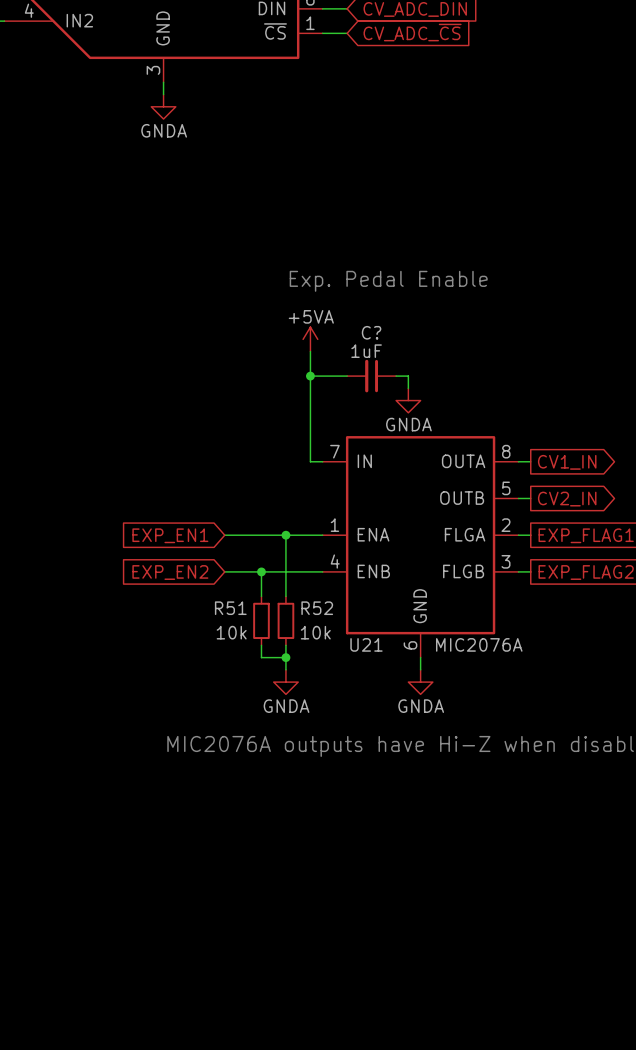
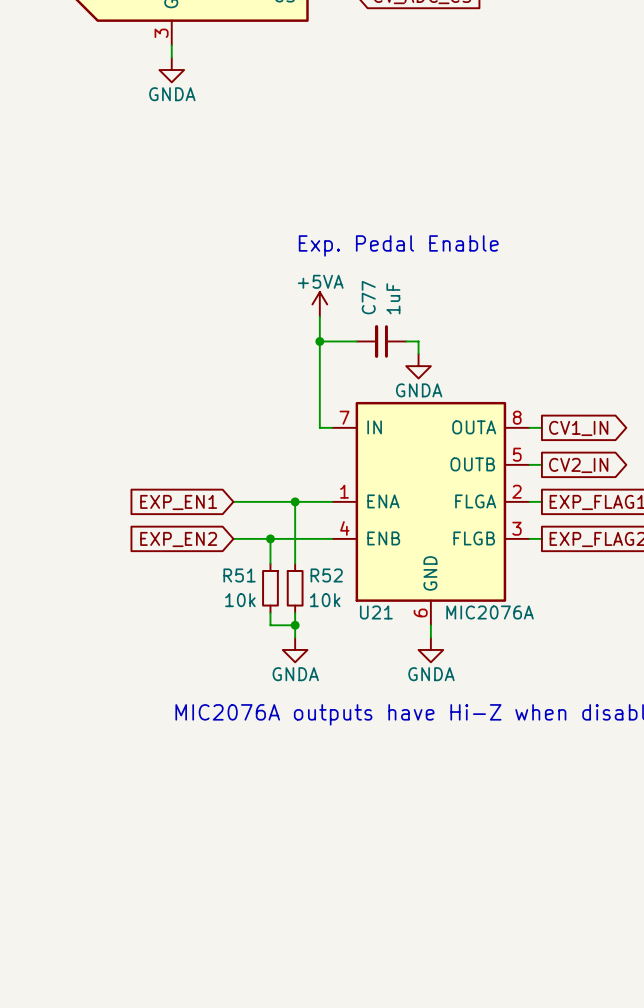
C? name: C? (371, 332) -> C77 (368, 297)
C? value rotation: 0° (366, 351) -> 90° counterclockwise (393, 298)

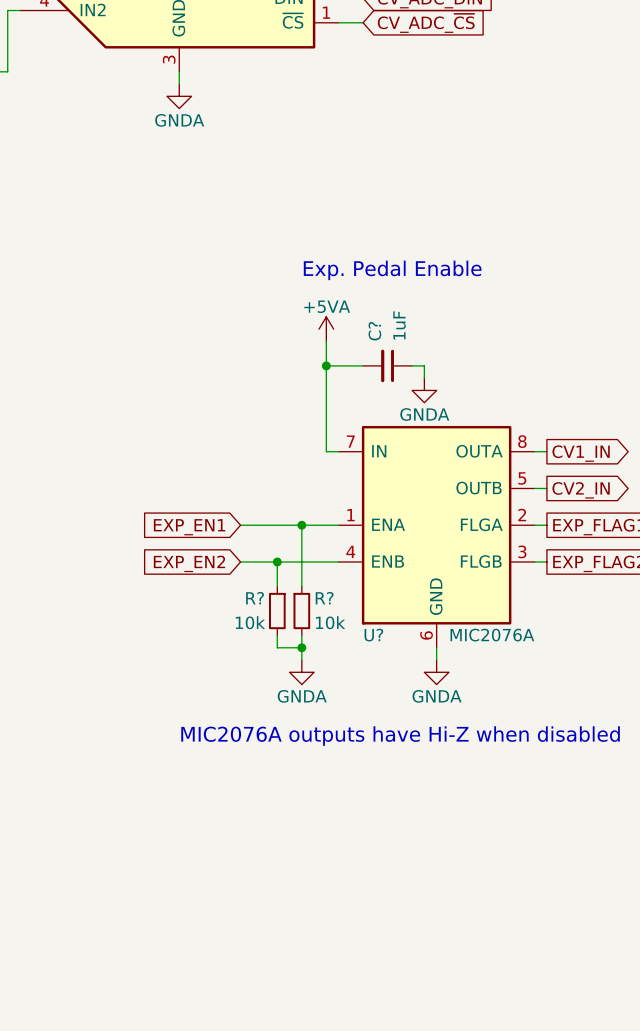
C77 name: C77 (368, 297) -> C? (374, 331)
R51 name: R51 (239, 575) -> R? (255, 598)
R52 name: R52 (326, 575) -> R? (324, 598)
U21 name: U21 (376, 612) -> U? (373, 635)

